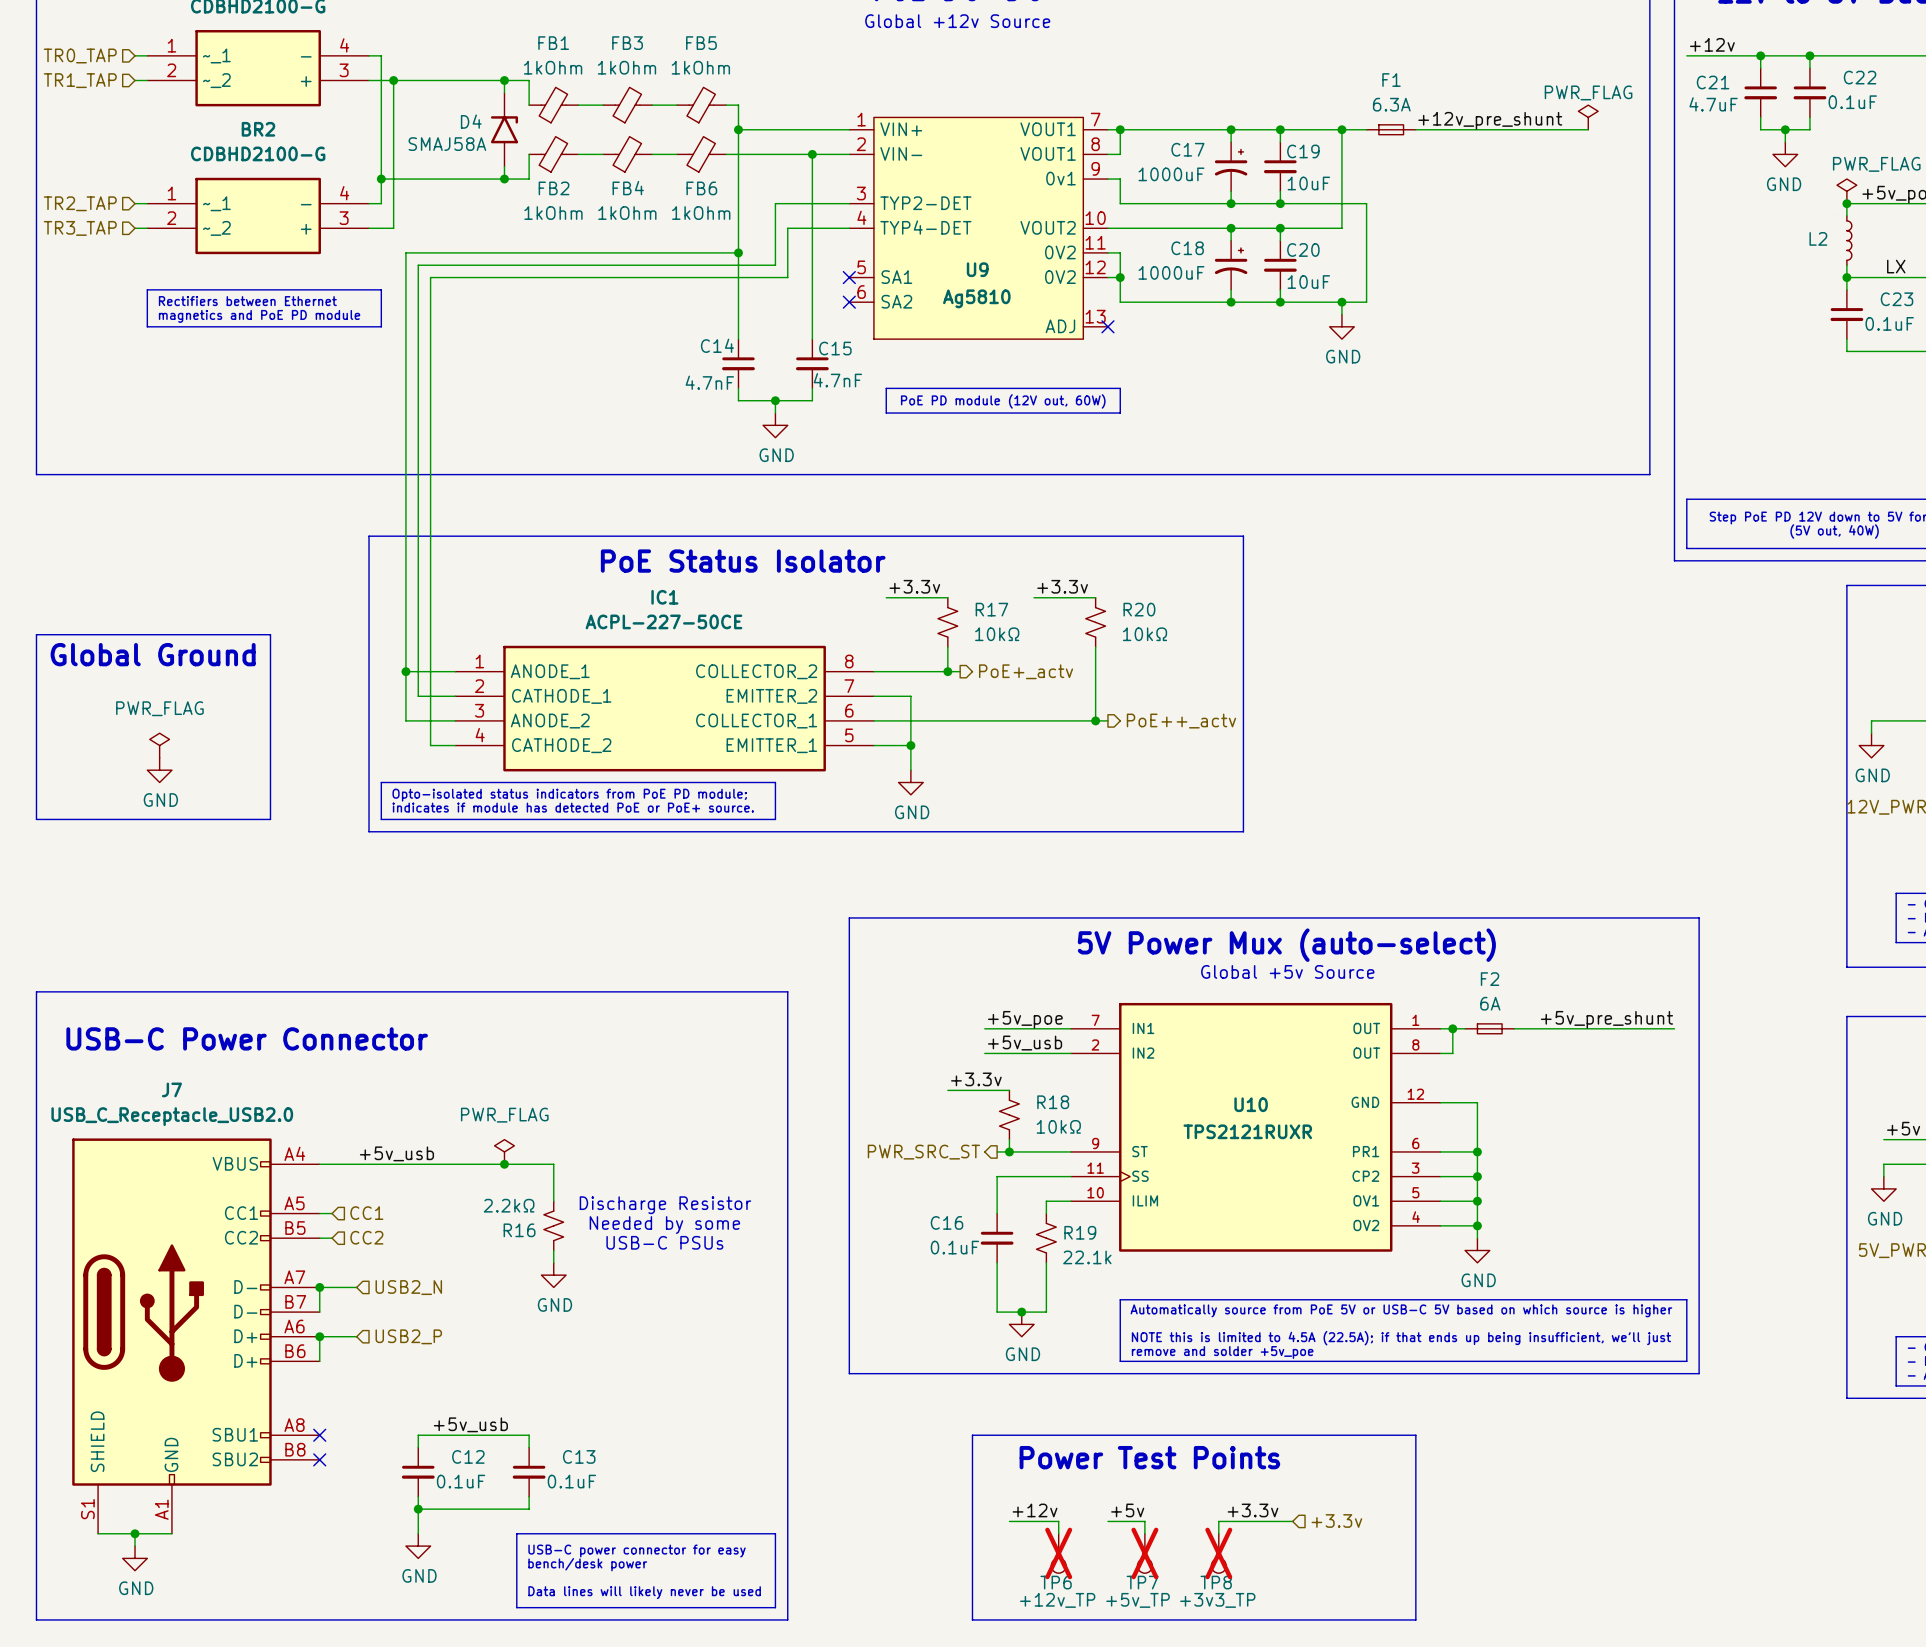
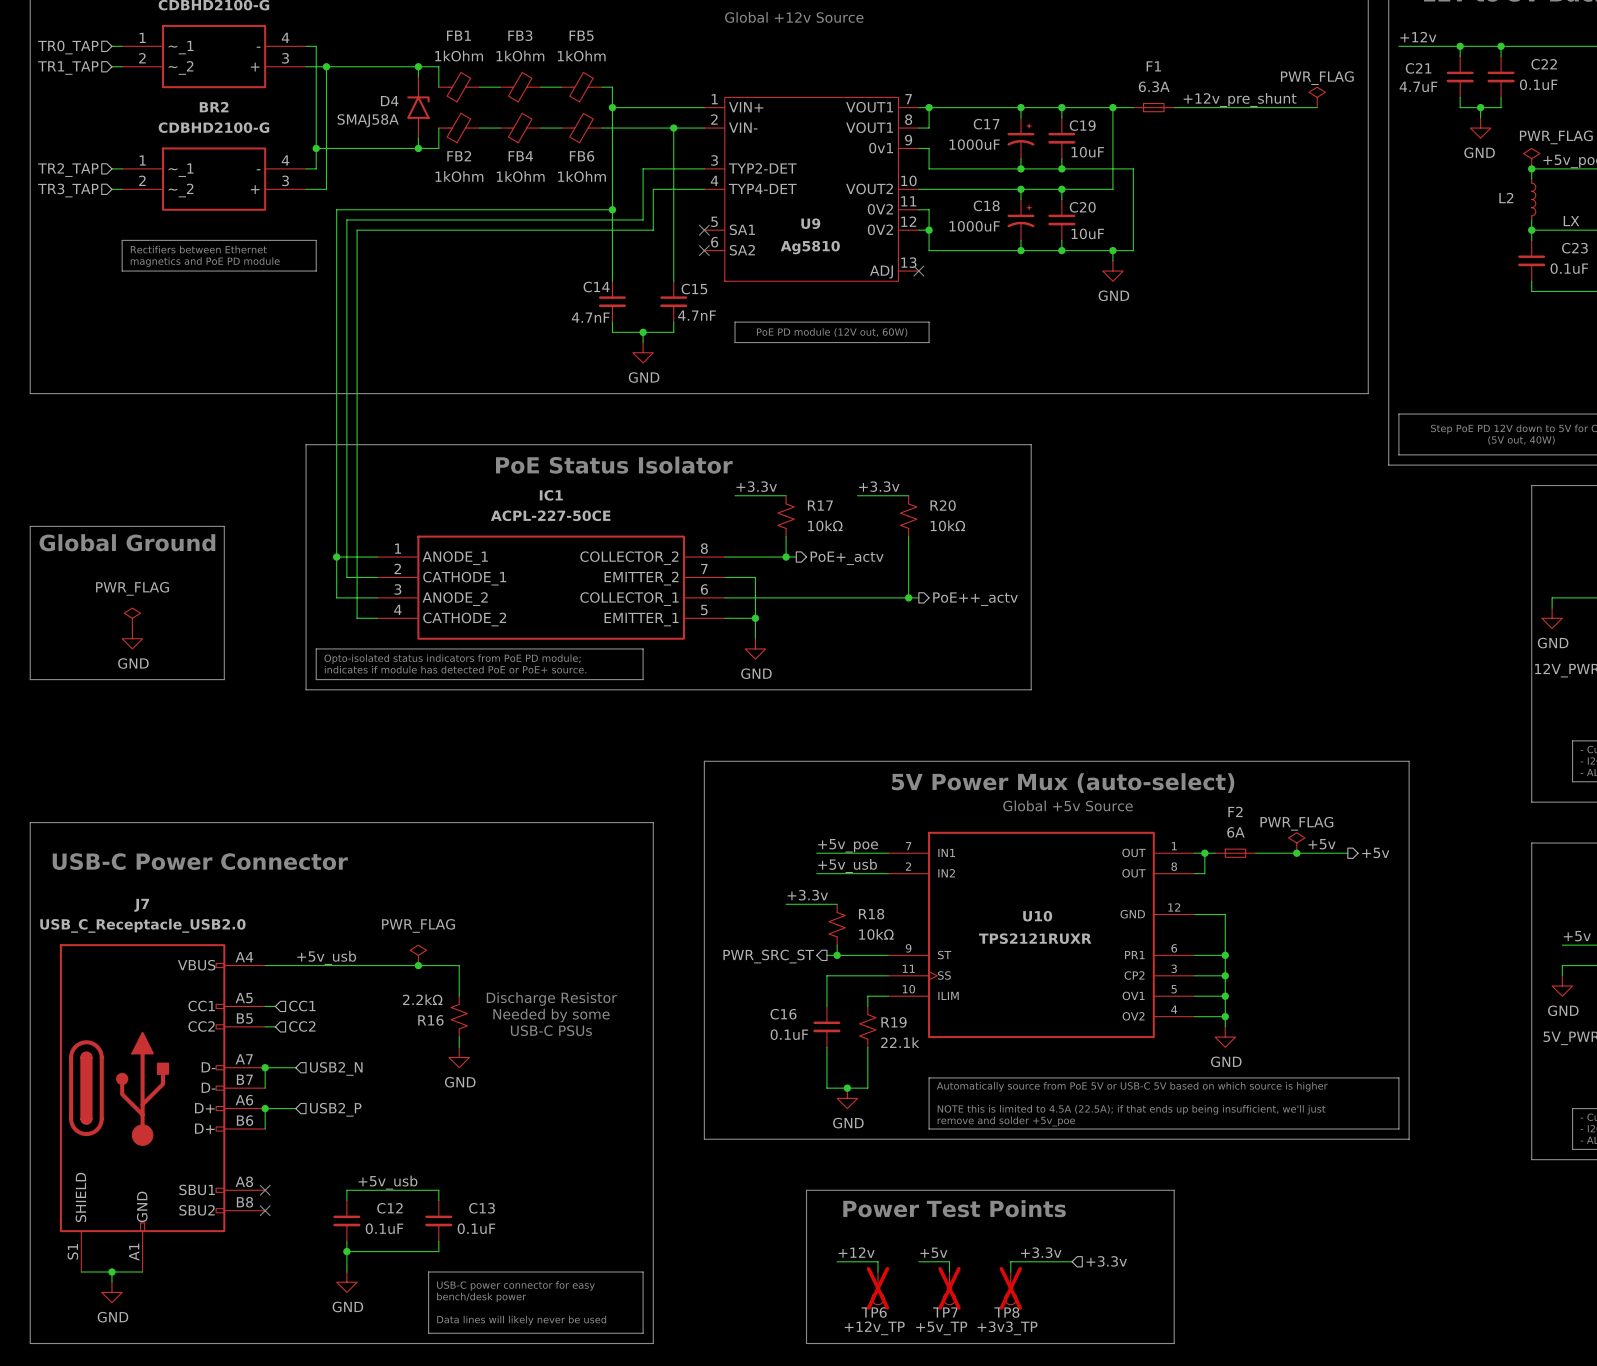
power symbol: none -> PWR_FLAG (1296, 843)
label: none -> +5v (1322, 844)
label: +5v_pre_shunt (1606, 1019) -> none
junction: none -> (1296, 853)
wire: (1625, 1028) (1674, 1028) -> none
hierarchical label: none -> +5v (1375, 852)

